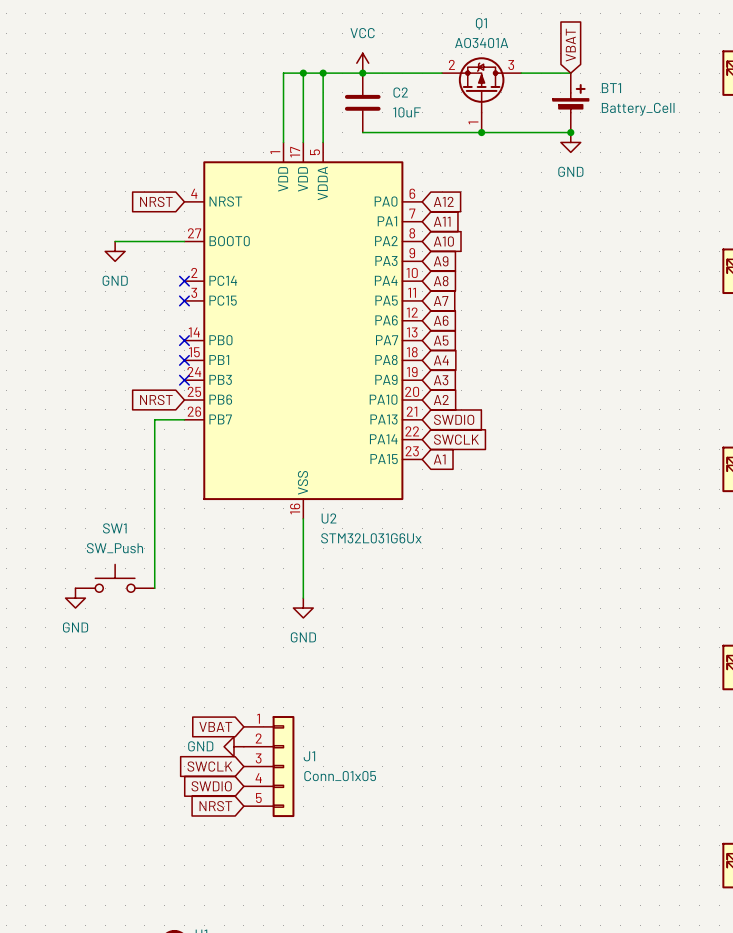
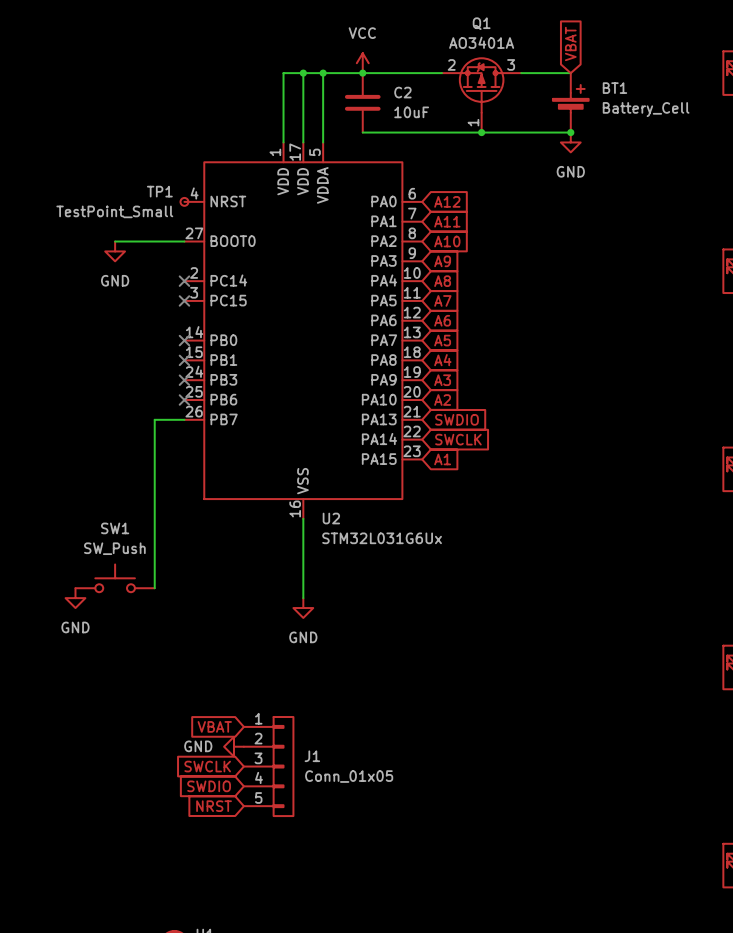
global label: NRST (156, 201) -> none
TP1: none -> TestPoint_Small (184, 201)
global label: NRST (156, 400) -> none
no-connect mark: none -> (184, 400)

